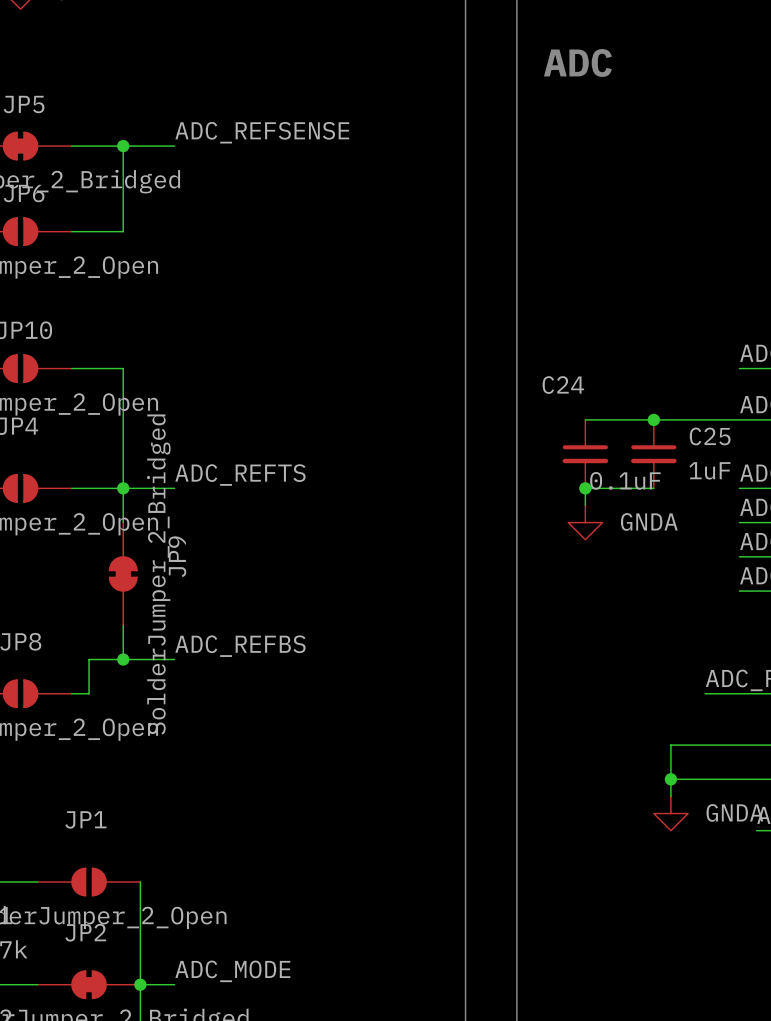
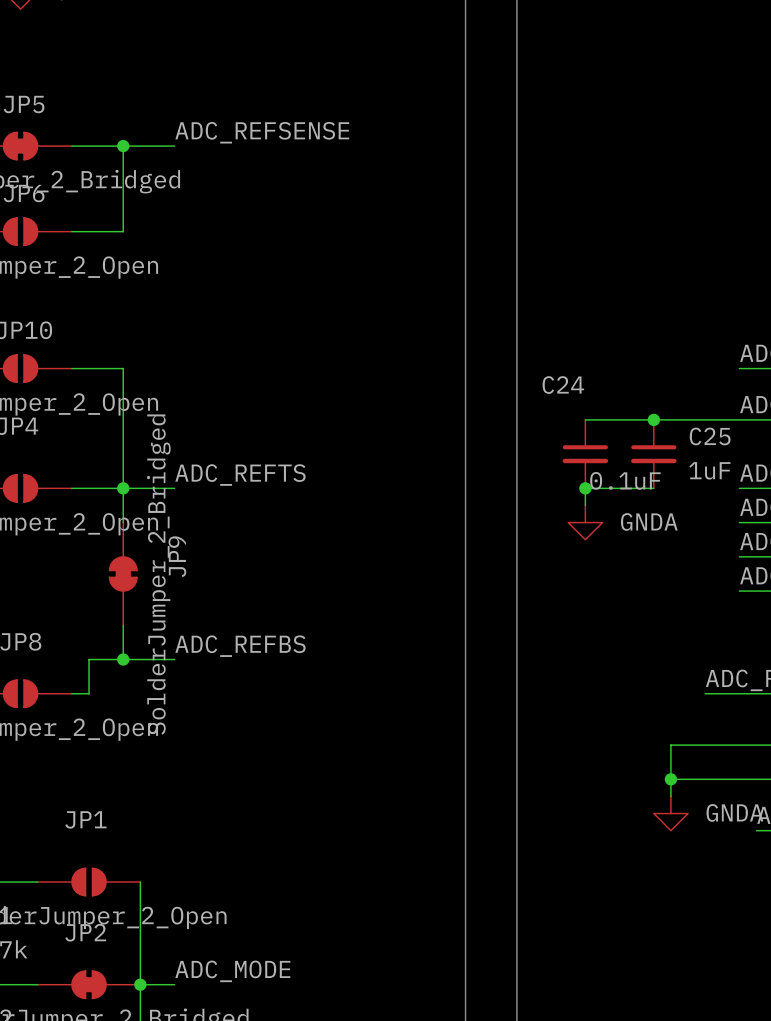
text: ADC (577, 62) -> none

